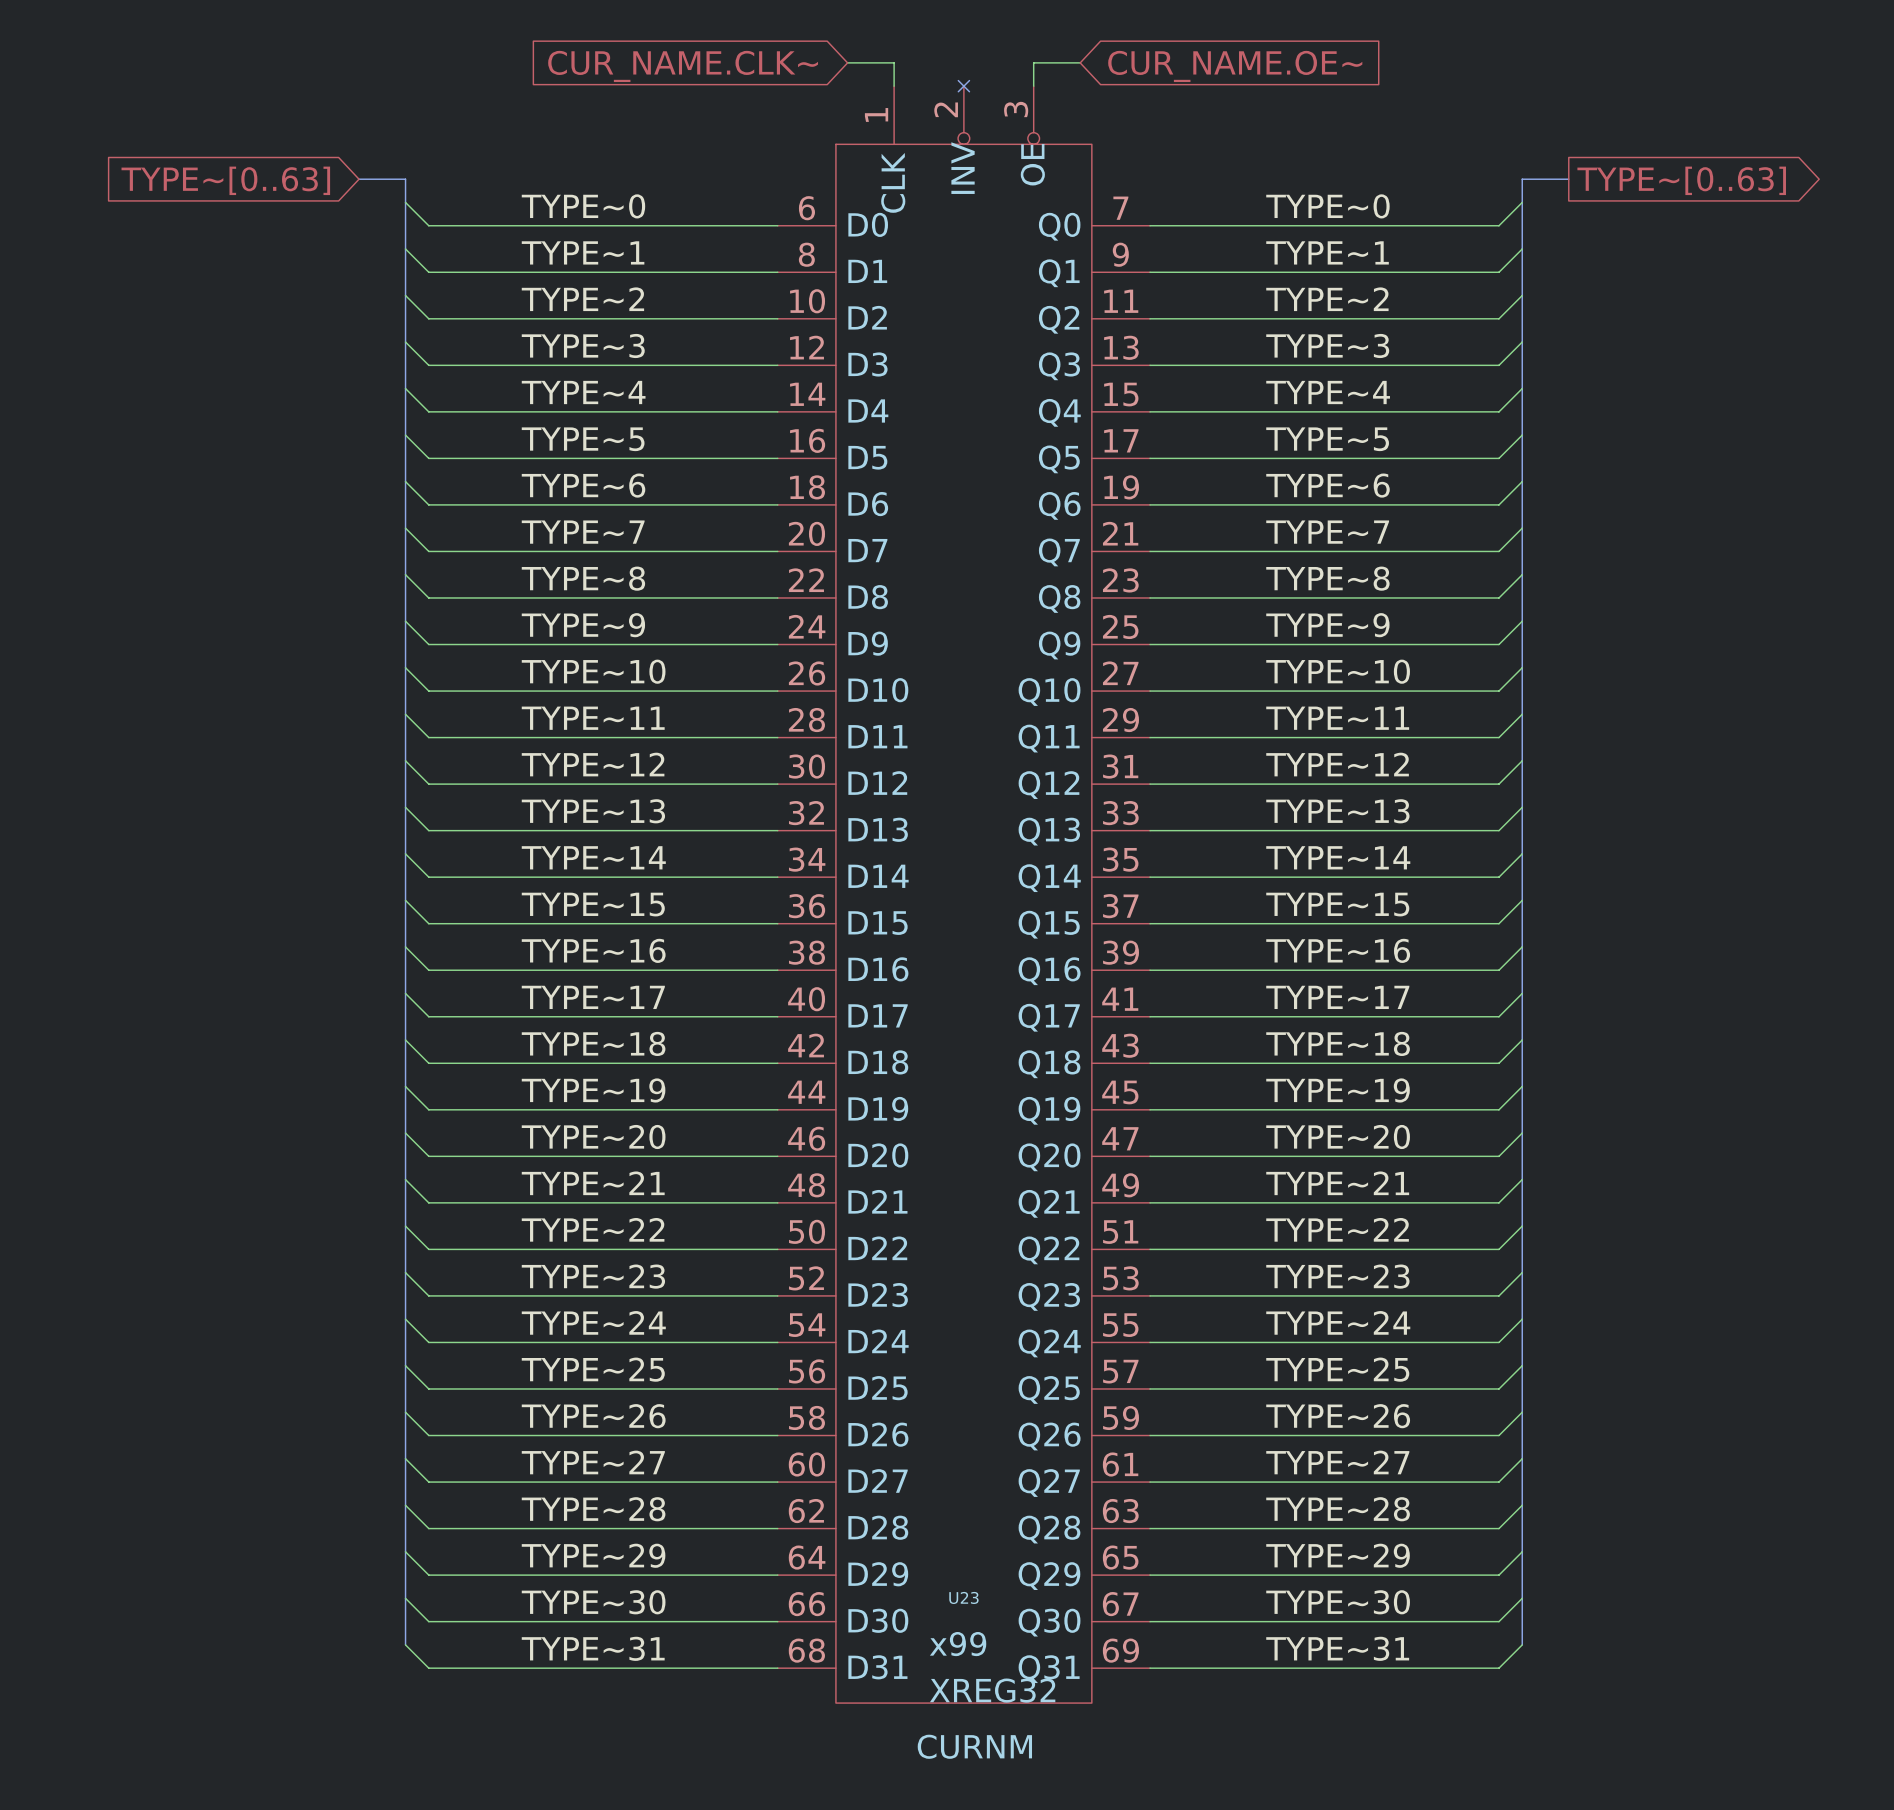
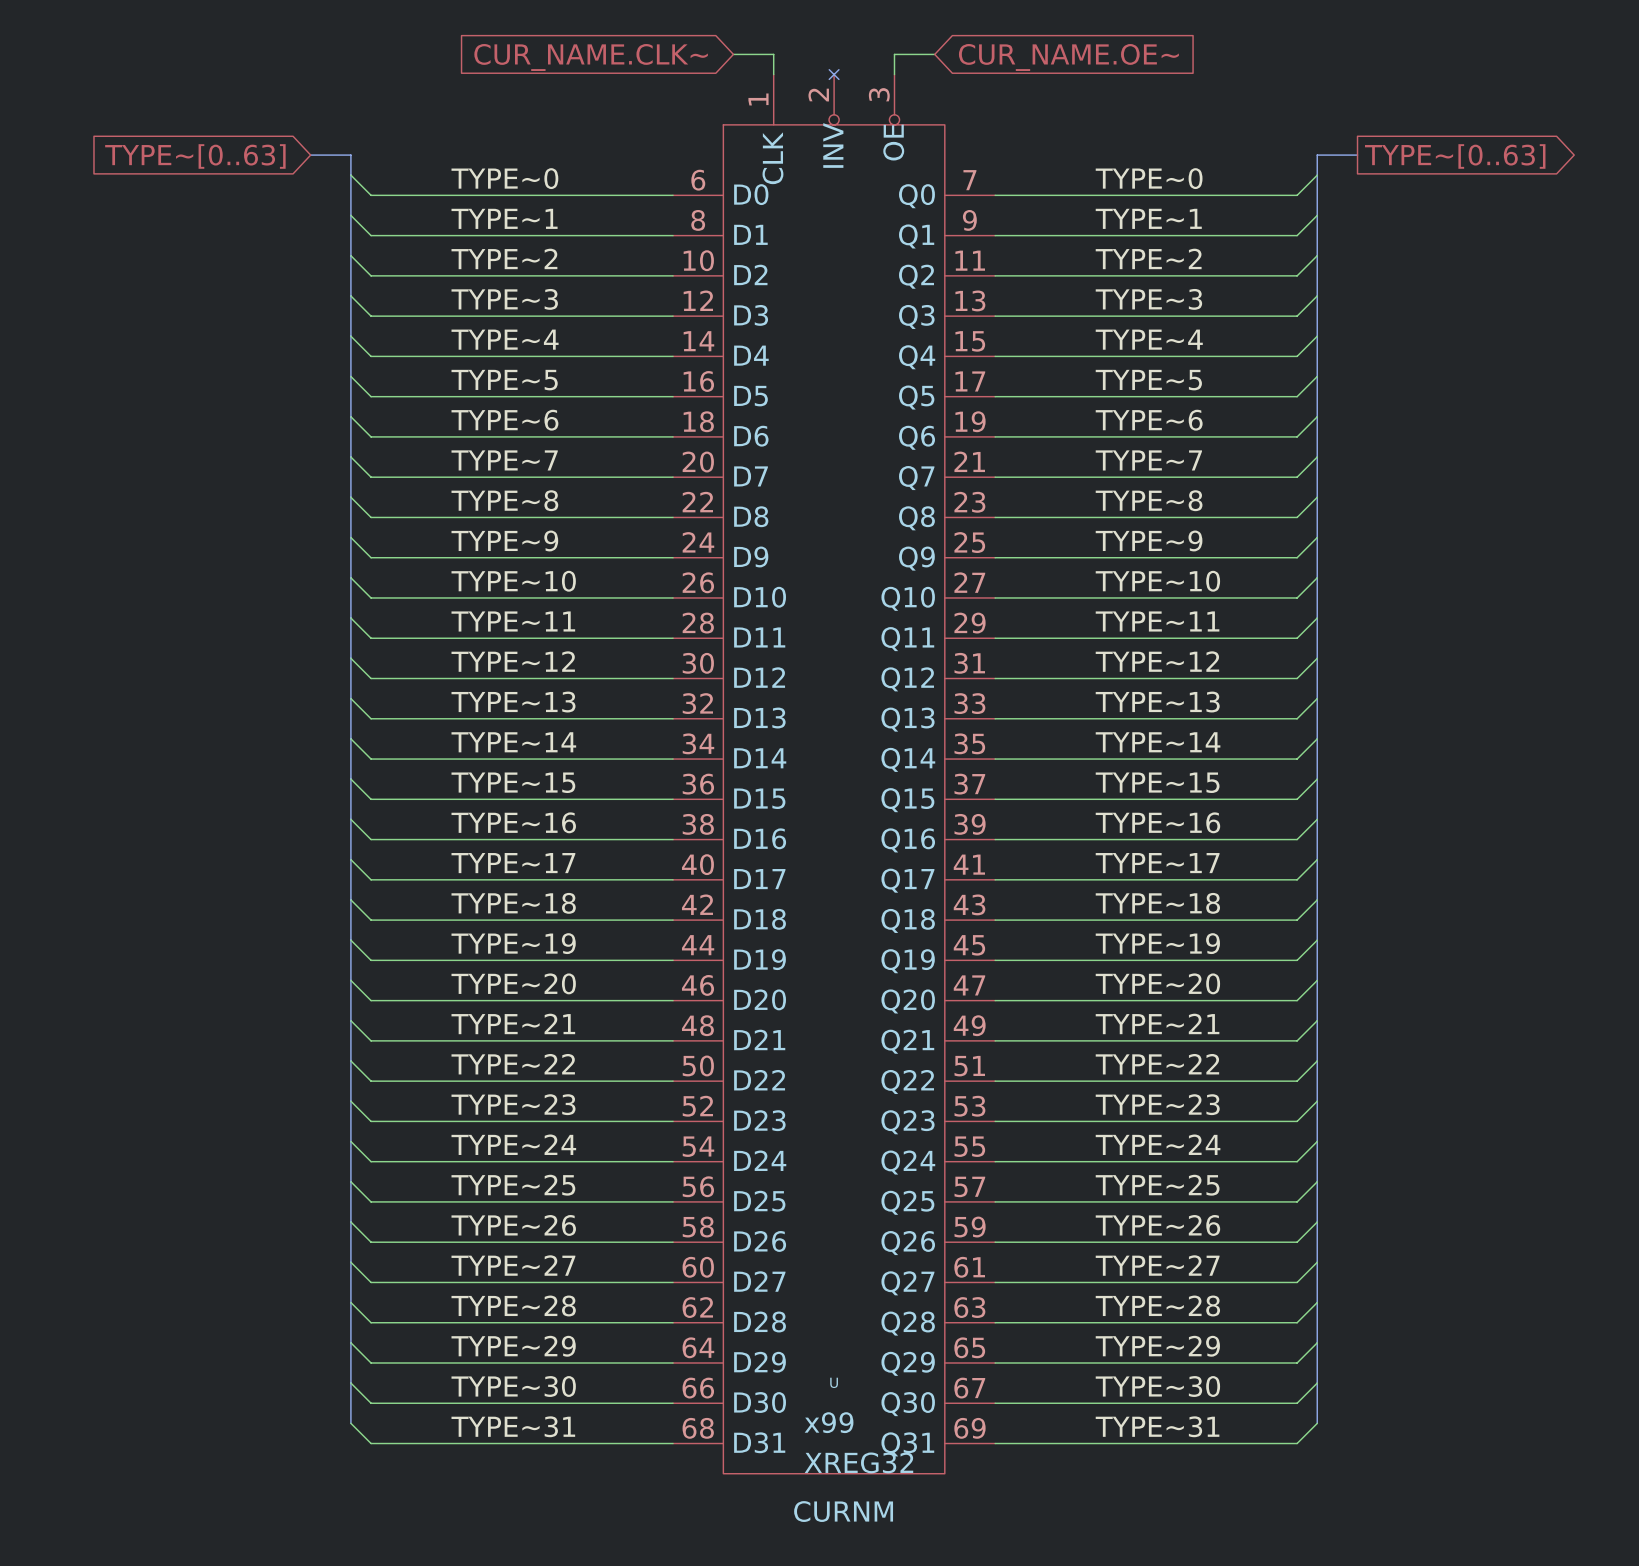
U23 name: U23 (963, 1597) -> U (834, 1382)

